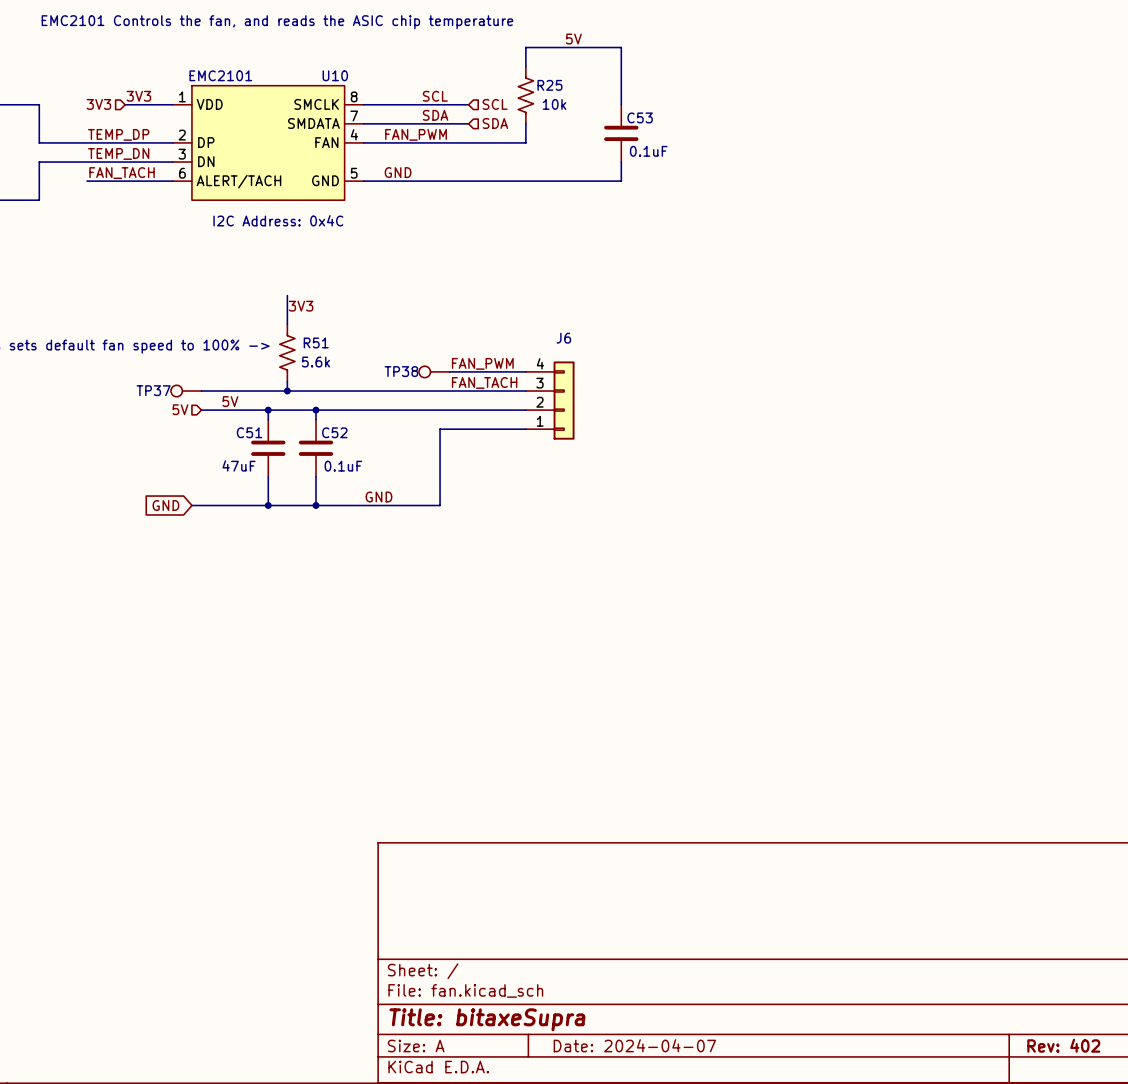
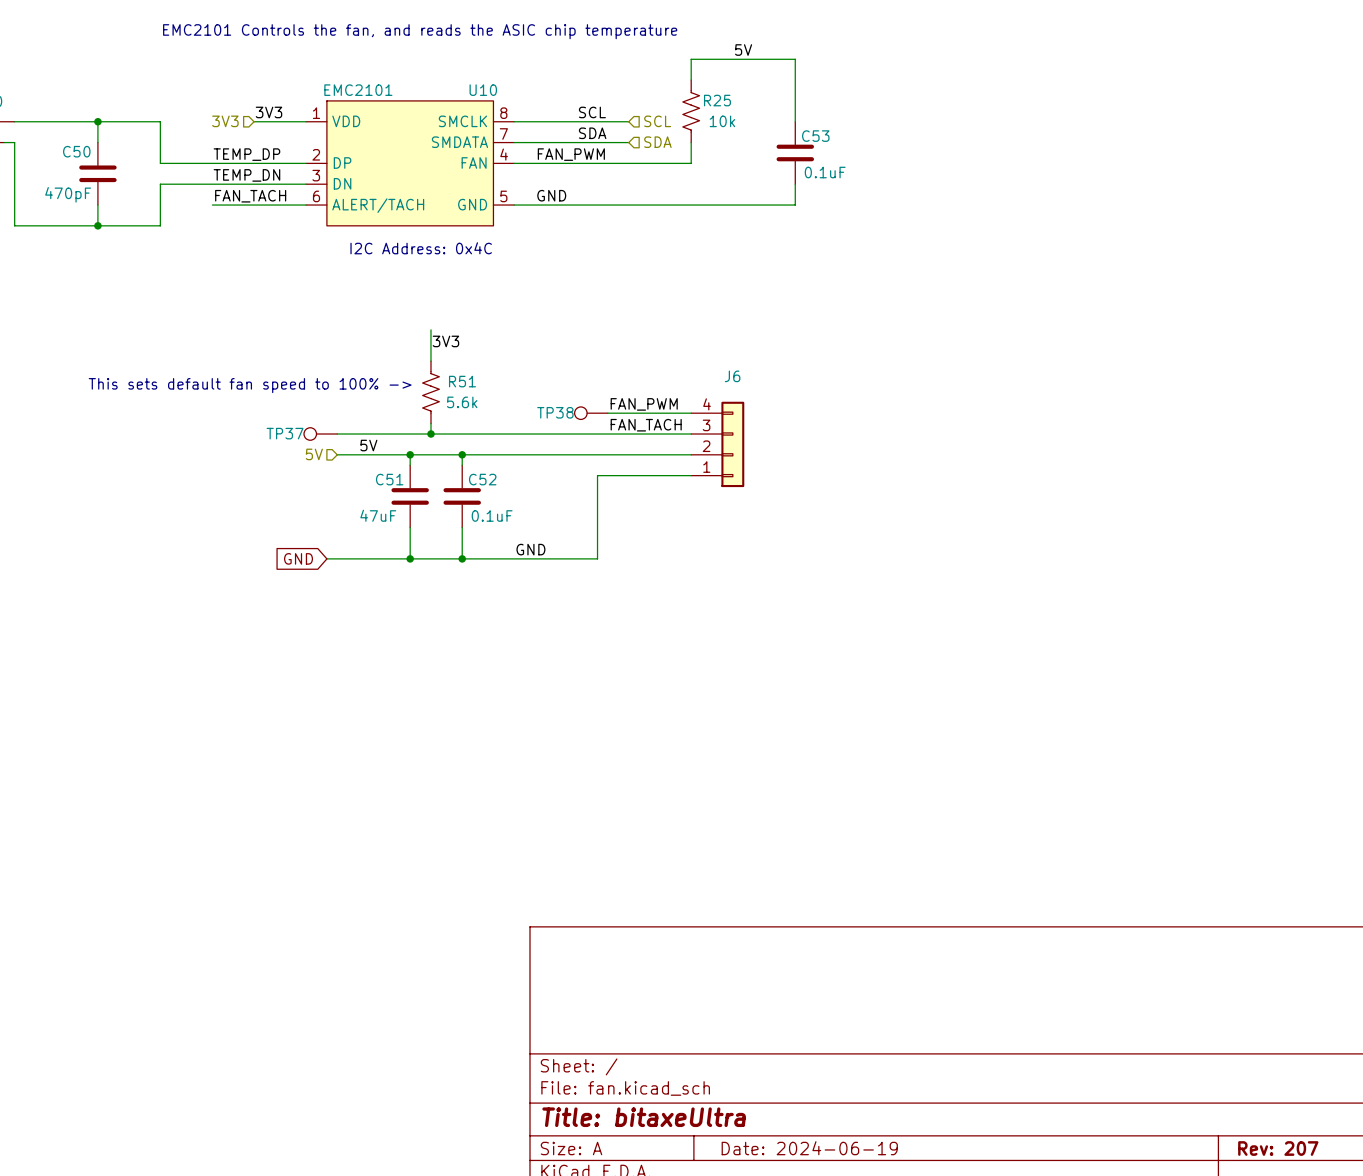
title block: Title: bitaxeSupra (487, 1019) -> Title: bitaxeUltra (644, 1117)
title block: Date: 2024-04-07 (634, 1045) -> Date: 2024-06-19 (809, 1148)
title block: Rev: 402 (1063, 1045) -> Rev: 207 (1278, 1148)

